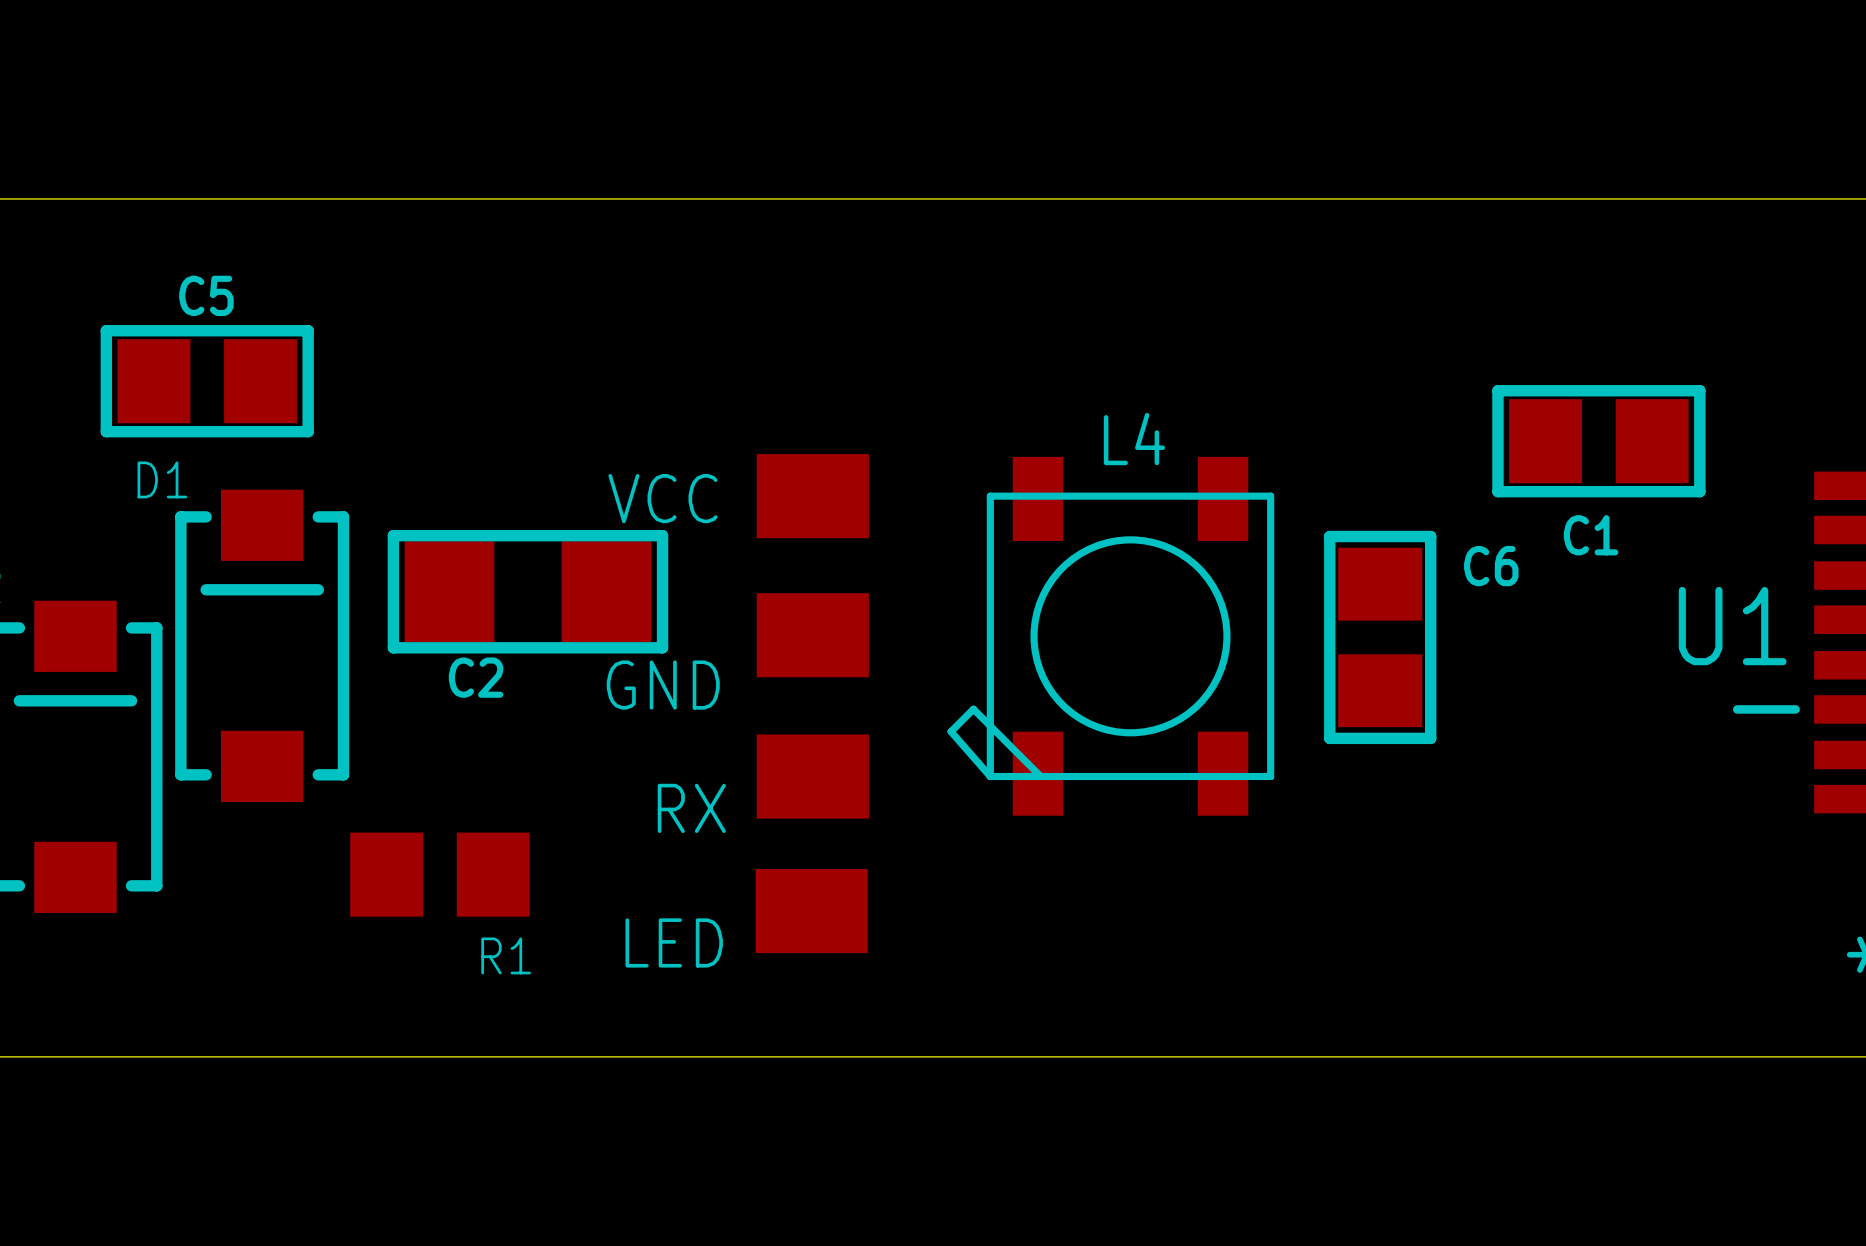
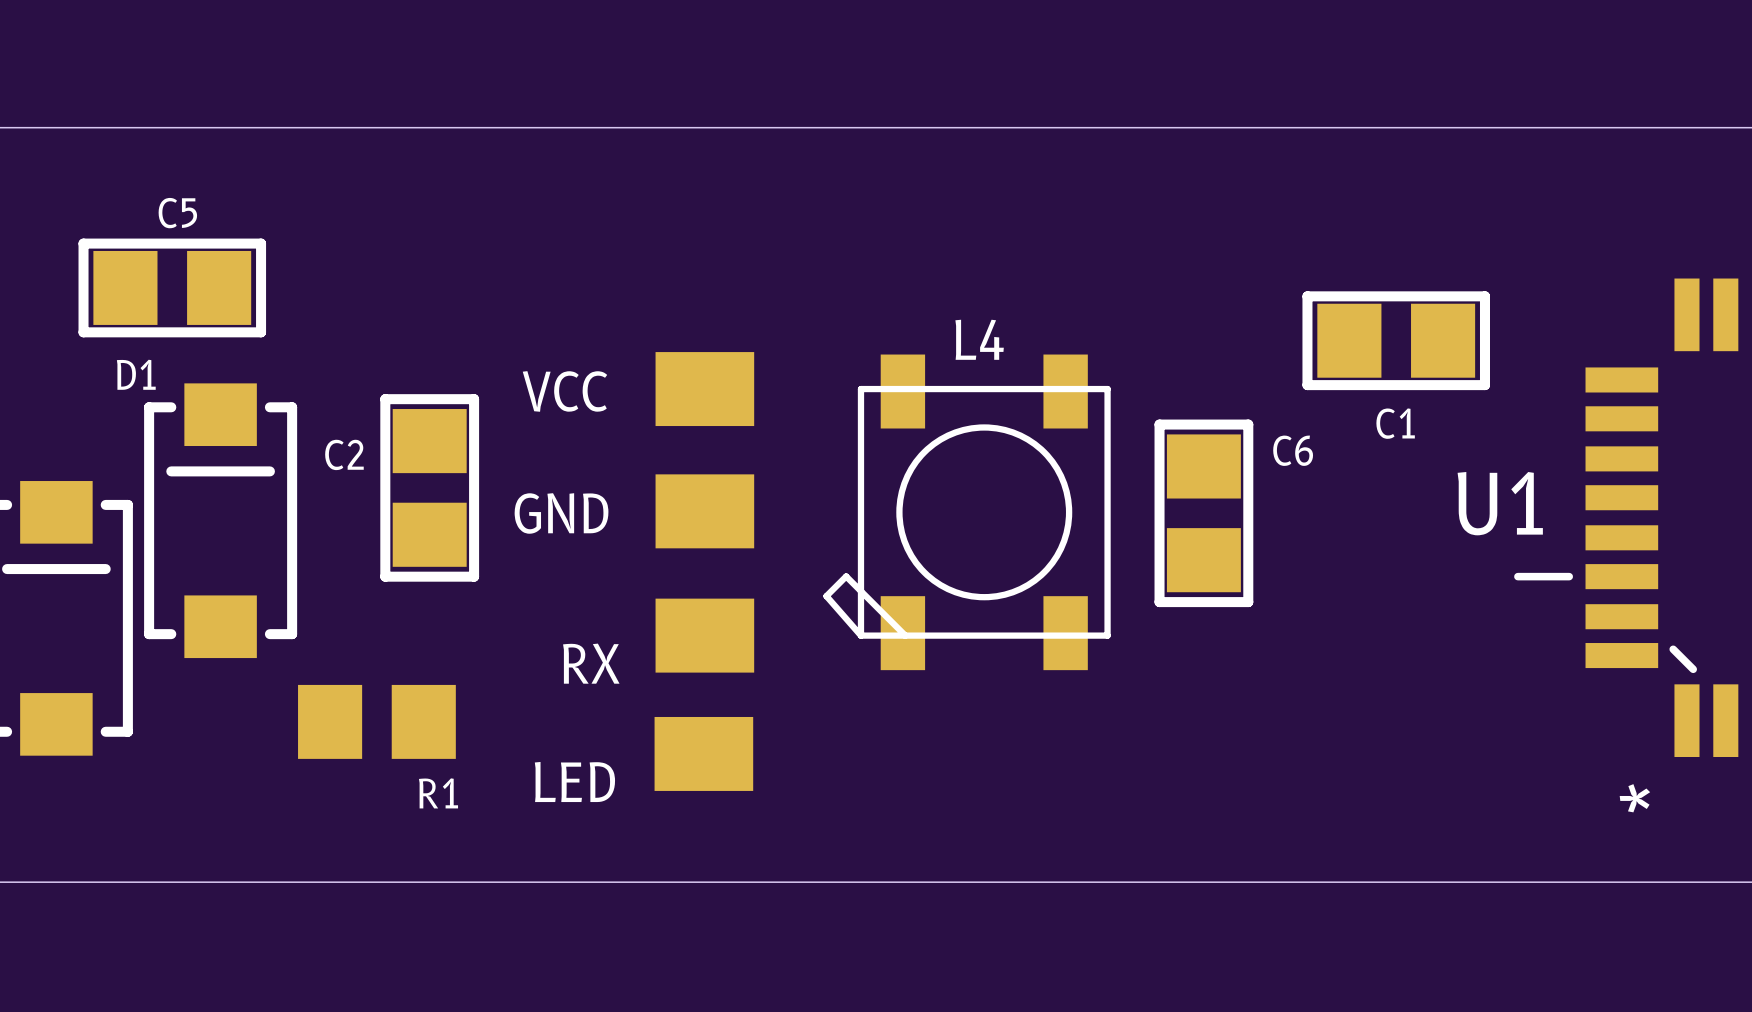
C2 footprint: [387, 529, 669, 654] -> [380, 394, 480, 582]
C2 name position: C2 (476, 677) -> C2 (344, 454)
text position: GND (663, 685) -> GND (561, 513)

